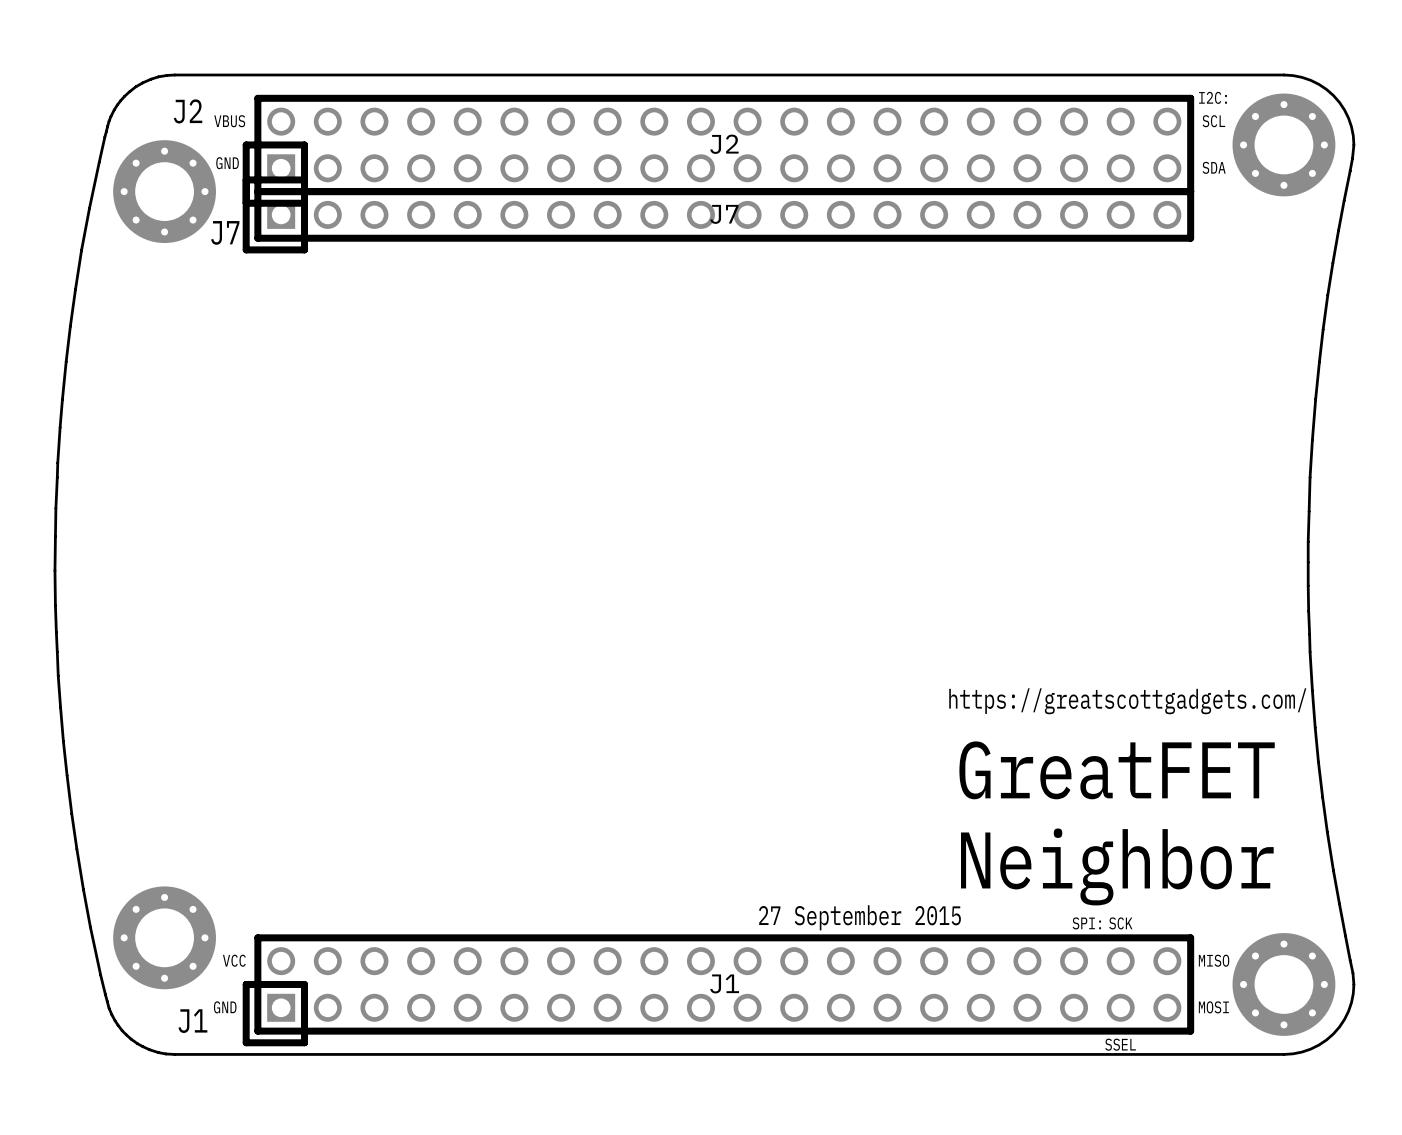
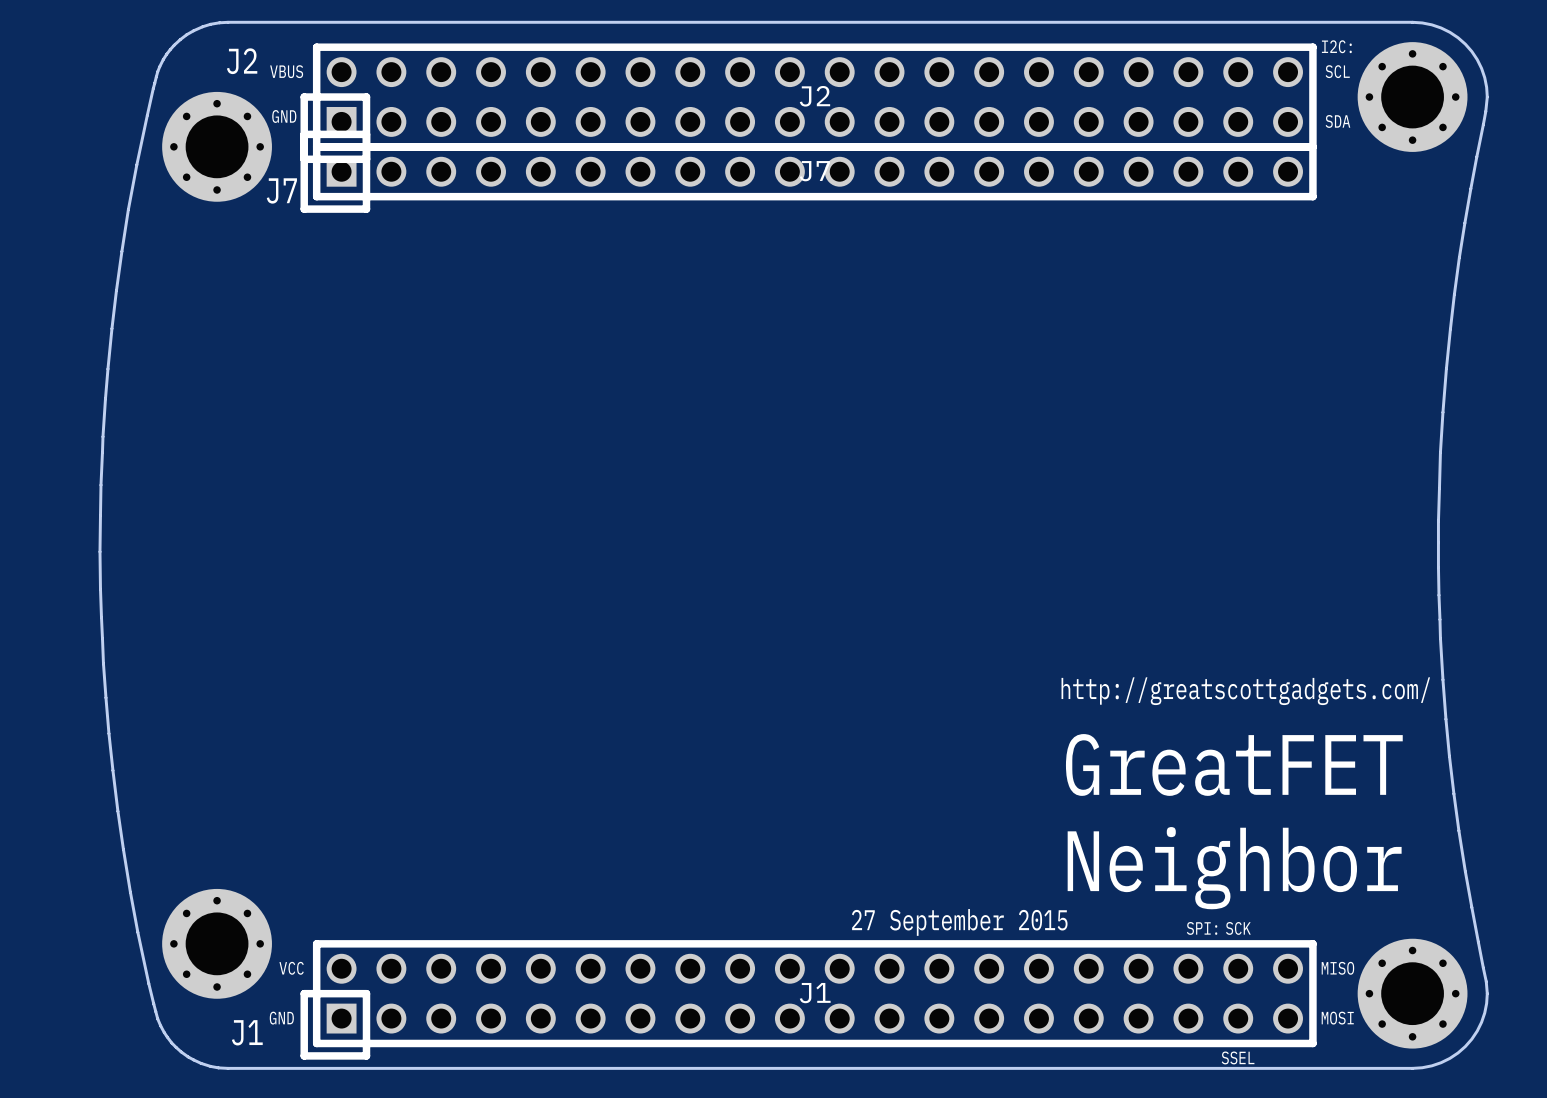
text: https://greatscottgadgets.com/ (1127, 701) -> http://greatscottgadgets.com/ (1245, 691)

